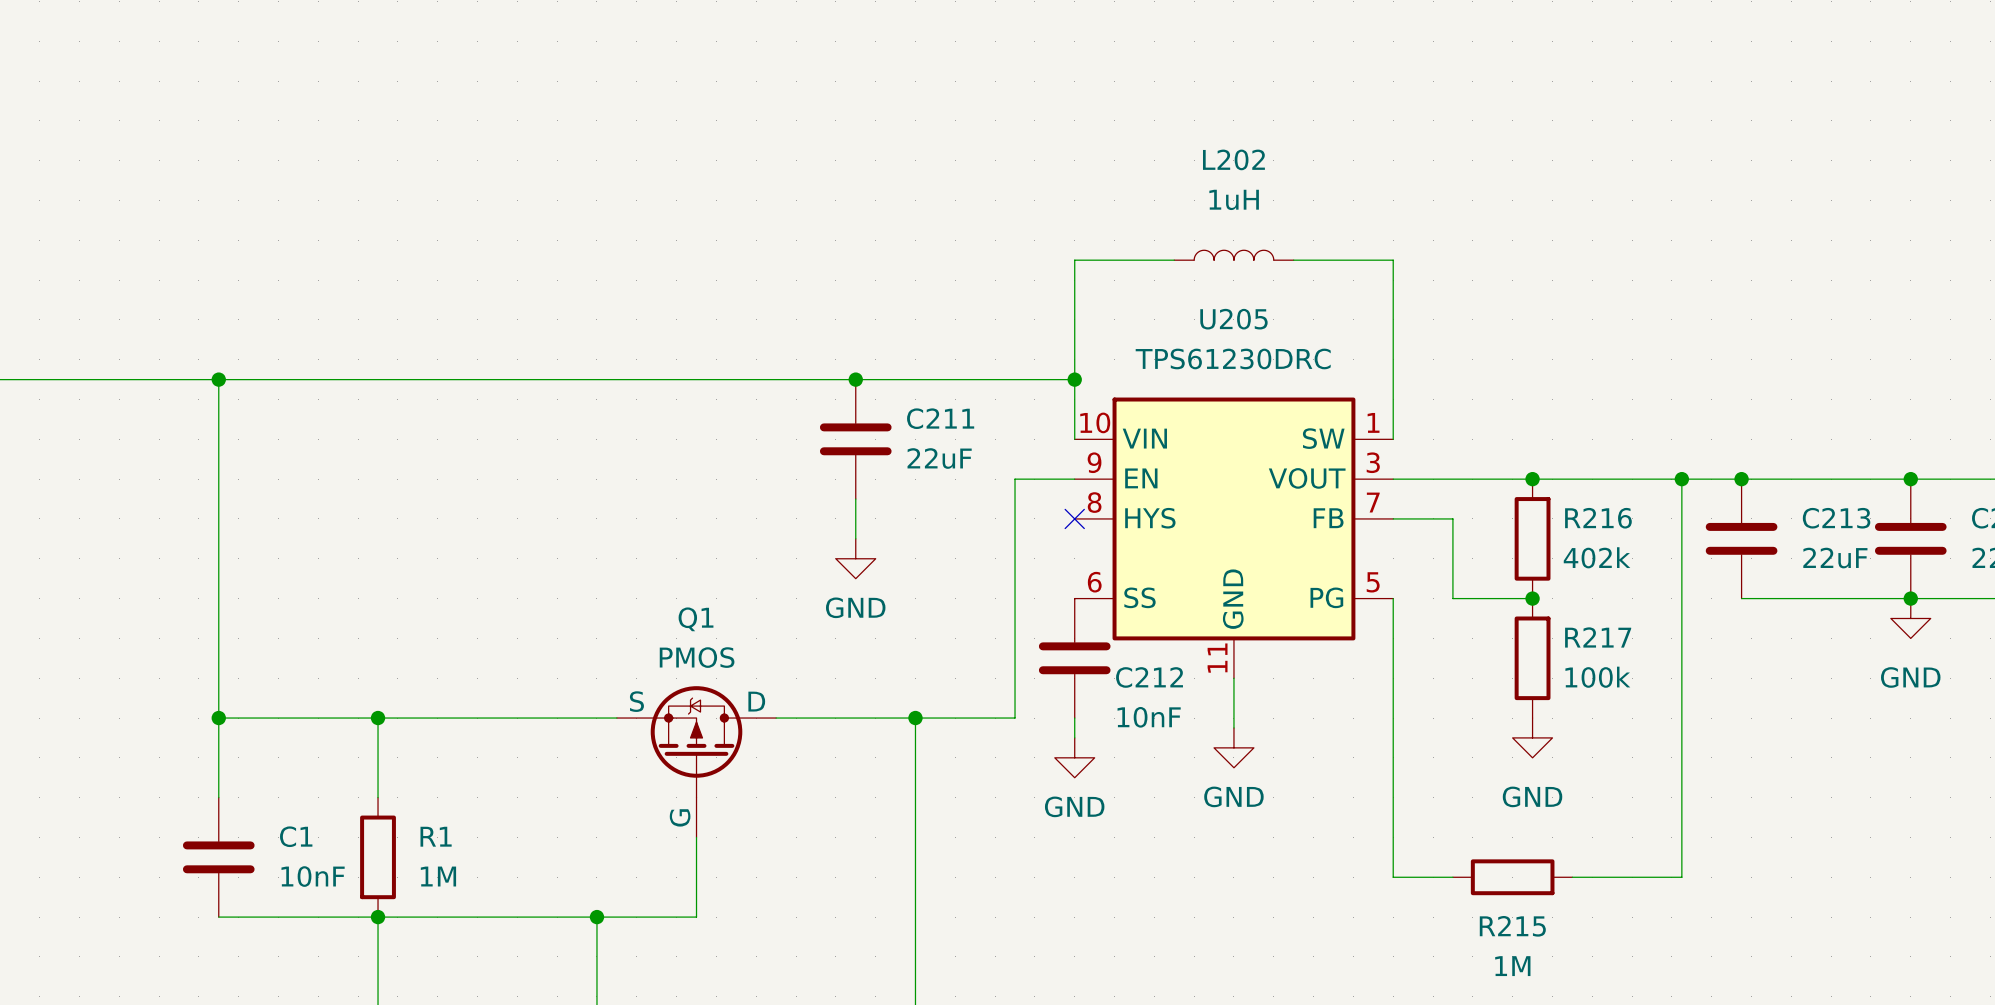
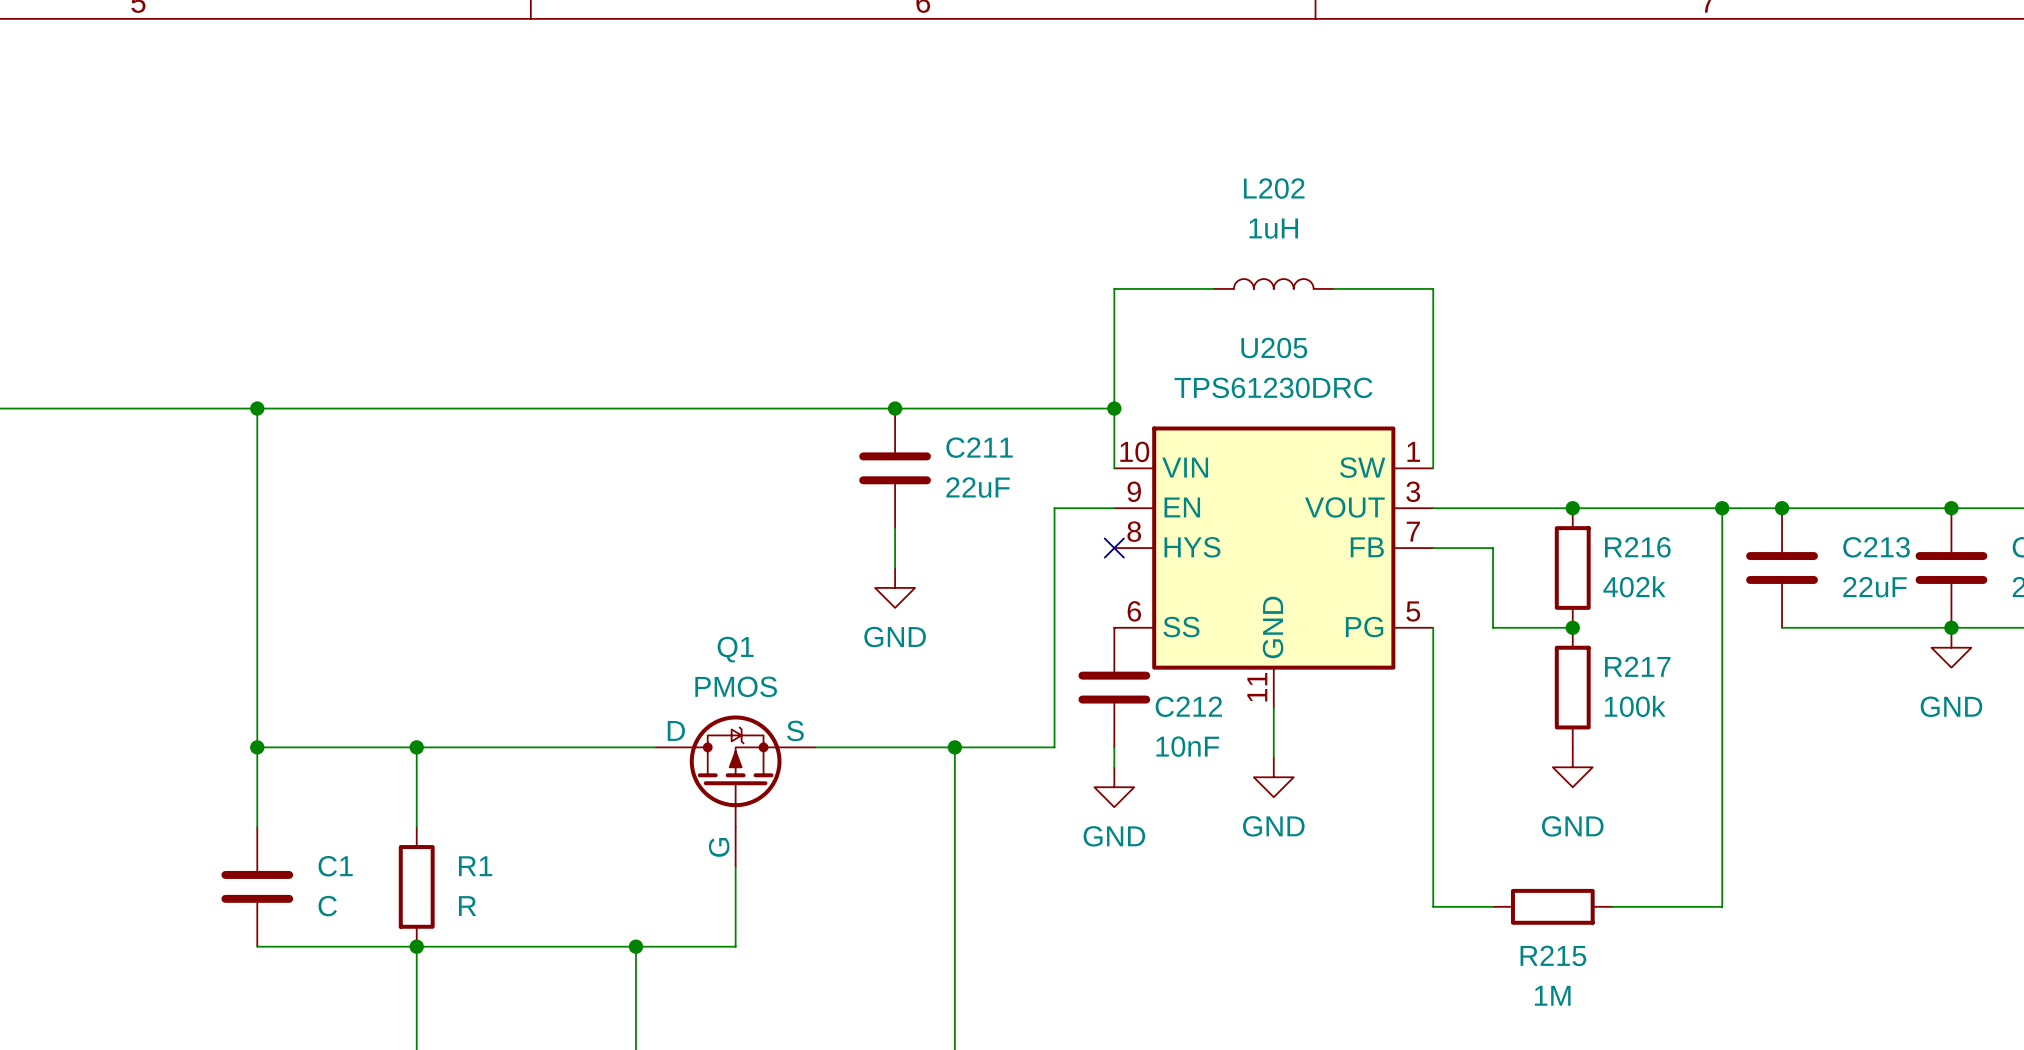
Q1 flip: as is (696, 741) -> left-right (735, 771)
C1 value: 10nF (313, 876) -> C (327, 906)
R1 value: 1M (438, 876) -> R (467, 906)

